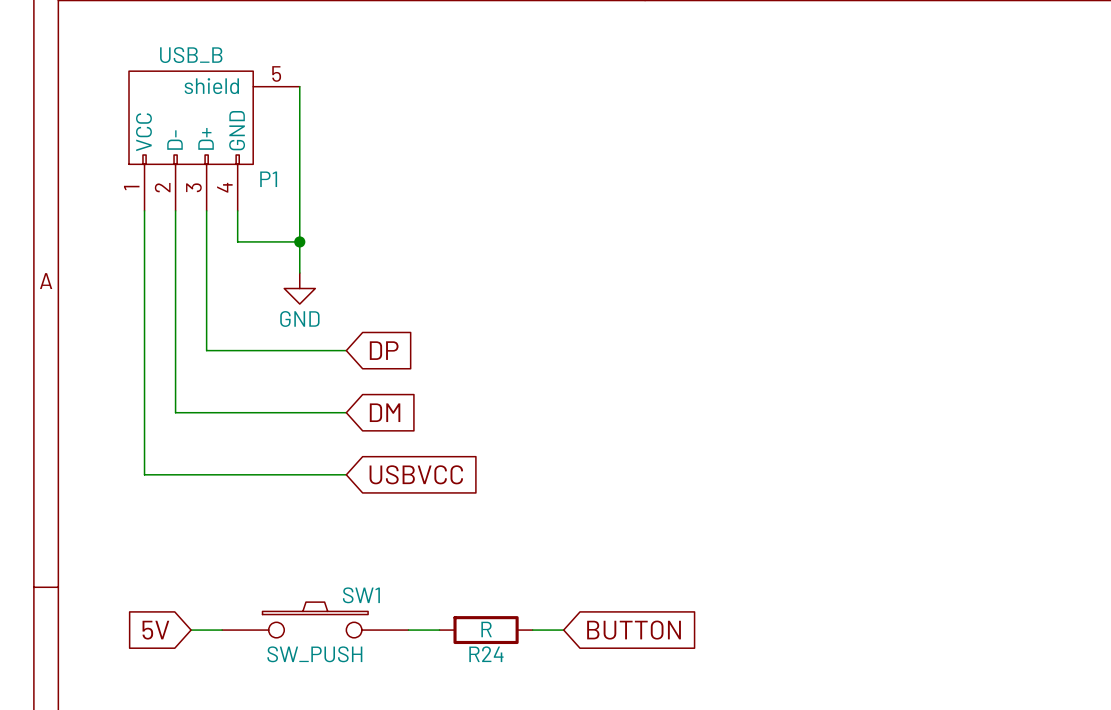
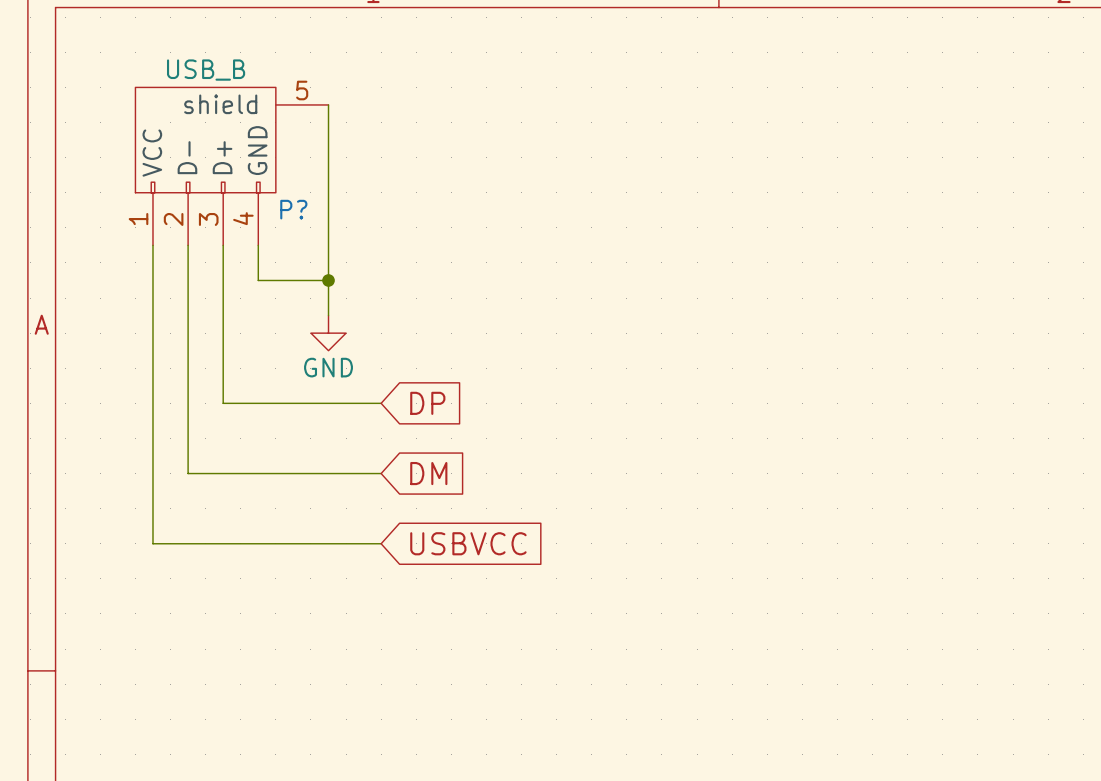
P1 name: P1 (268, 179) -> P? (293, 209)
SW1: SW_PUSH (315, 619) -> none
global label: 5V (155, 630) -> none
wire: (191, 630) (222, 630) -> none
wire: (408, 630) (439, 630) -> none
R24: R (486, 630) -> none
wire: (532, 630) (563, 630) -> none
global label: BUTTON (634, 630) -> none

